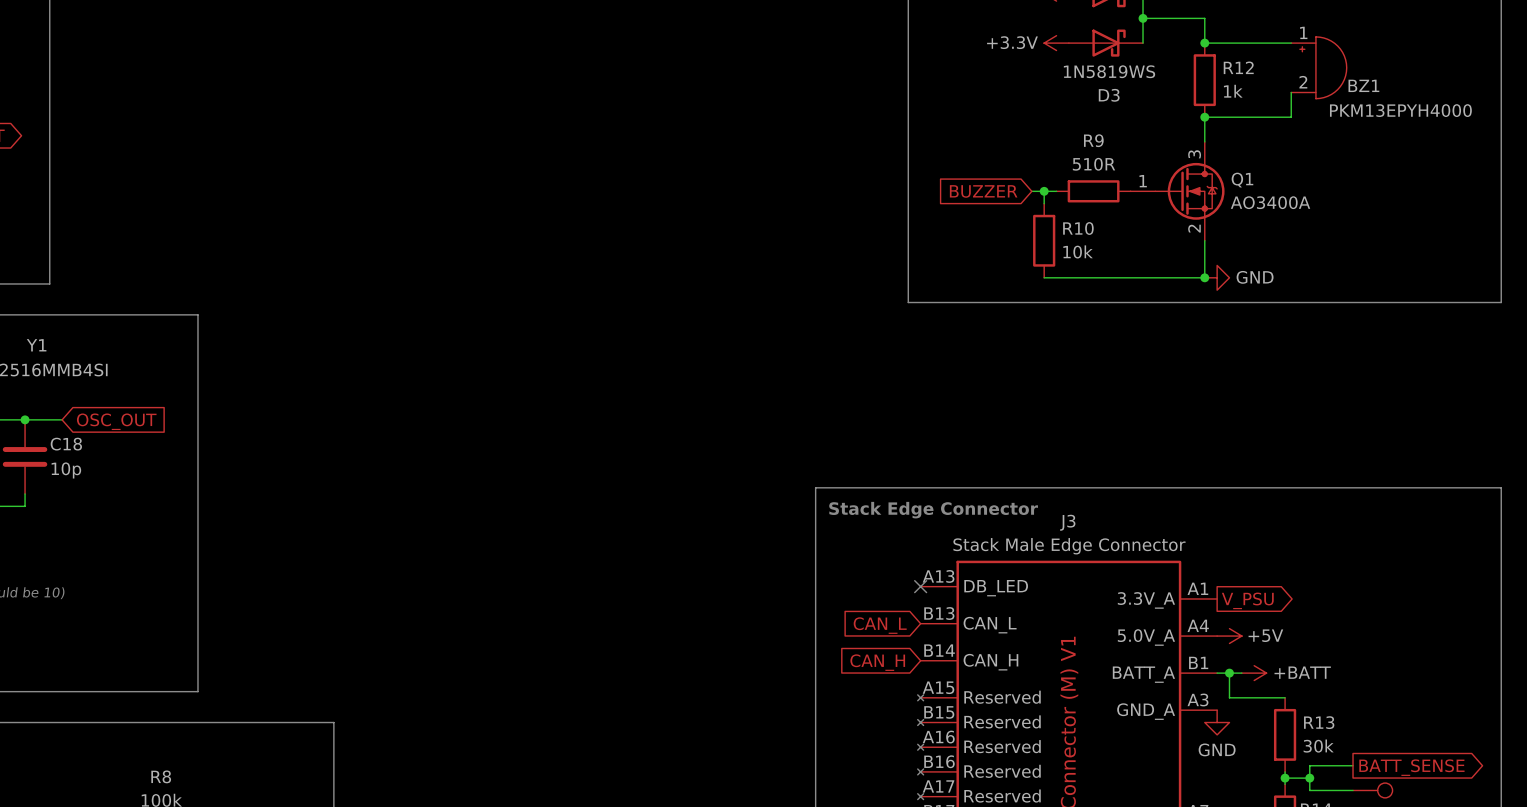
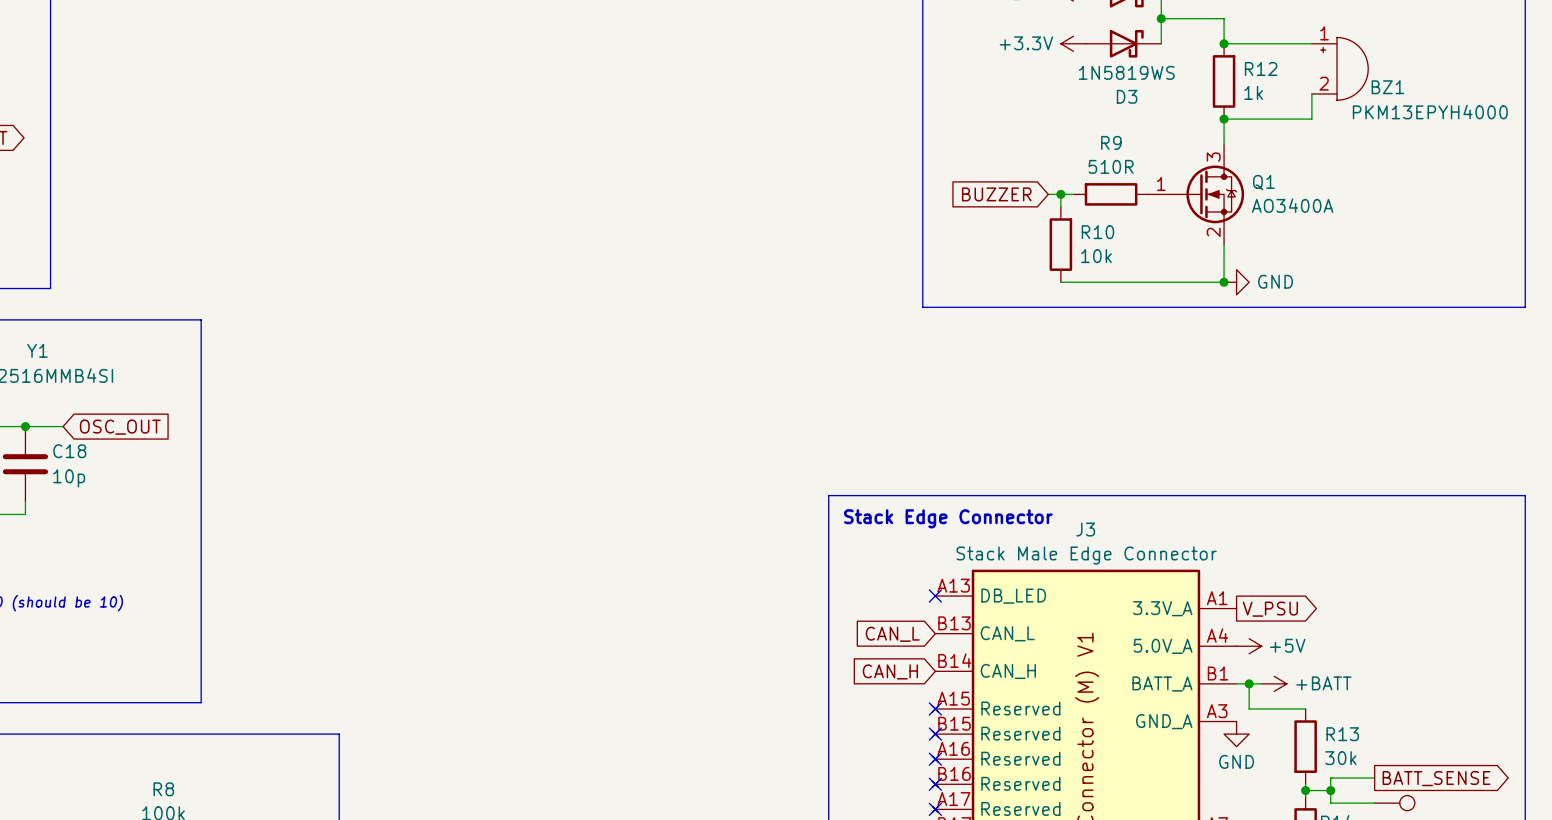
no-connect mark: none -> (935, 708)
no-connect mark: none -> (935, 734)
no-connect mark: none -> (935, 759)
no-connect mark: none -> (935, 784)
no-connect mark: none -> (935, 809)

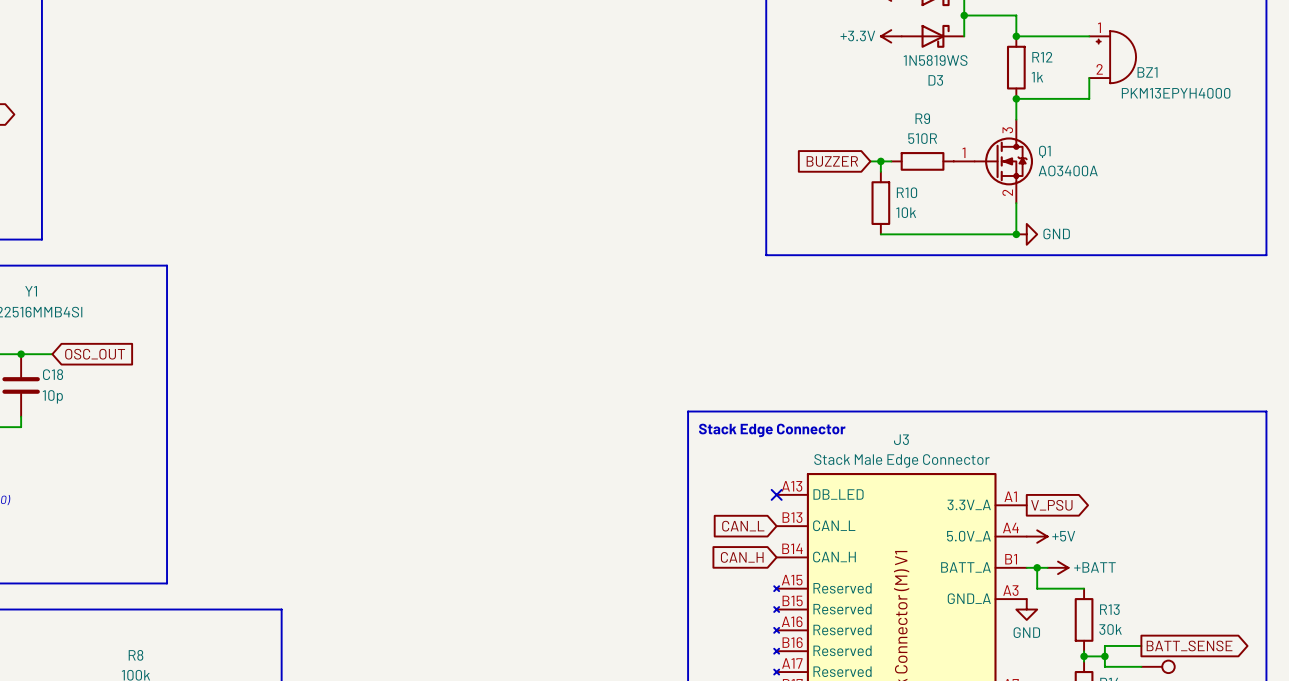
no-connect mark: (935, 708) -> none
no-connect mark: (935, 734) -> none
no-connect mark: (935, 759) -> none
no-connect mark: (935, 784) -> none
no-connect mark: (935, 809) -> none

